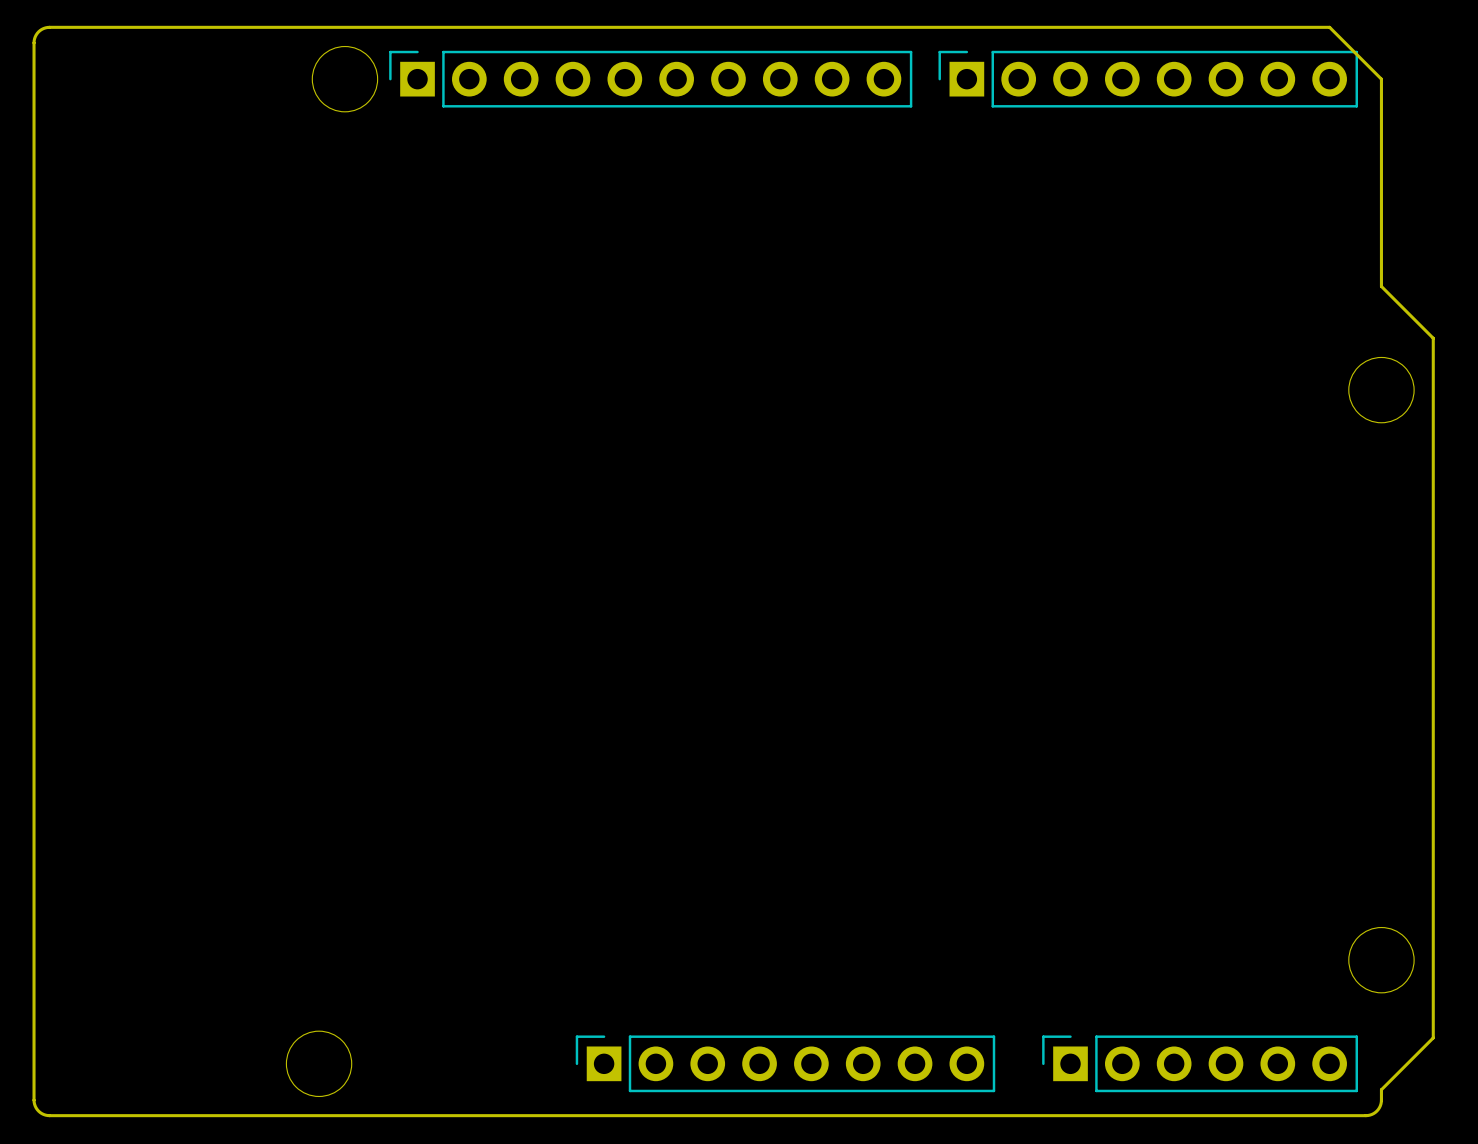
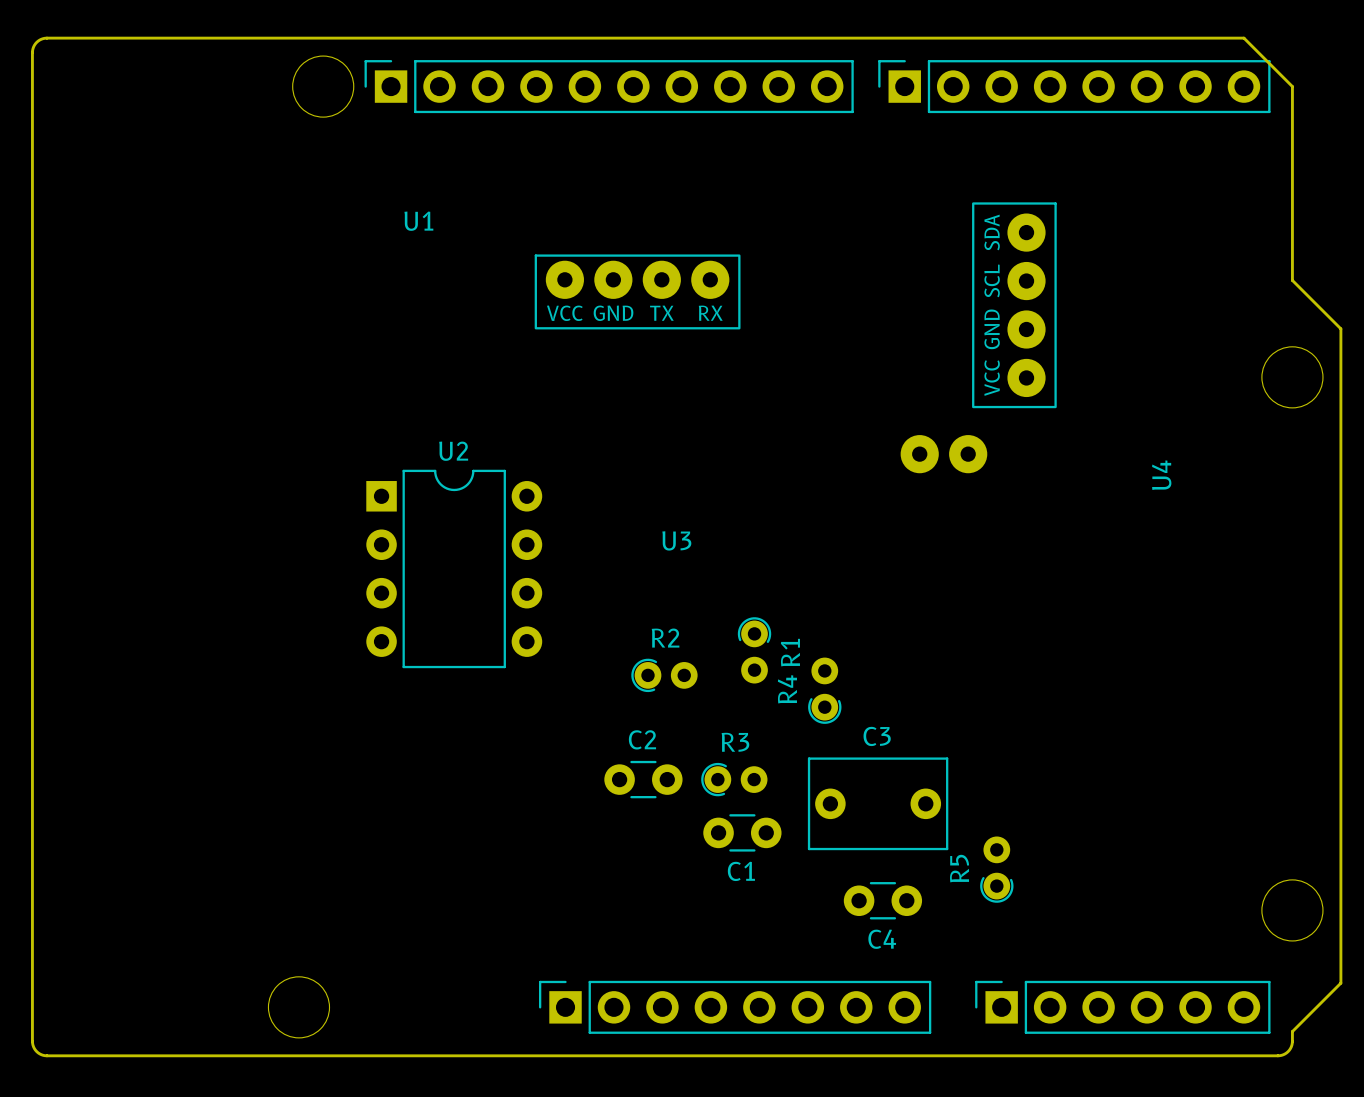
U1: none -> (637, 291)
U4: none -> (1014, 305)
U3: none -> (943, 454)
U2: none -> (454, 568)
R1: none -> (754, 650)
R2: none -> (664, 675)
R4: none -> (824, 690)
C2: none -> (643, 779)
R3: none -> (734, 779)
C3: none -> (878, 803)
C1: none -> (742, 832)
R5: none -> (996, 869)
C4: none -> (882, 900)

